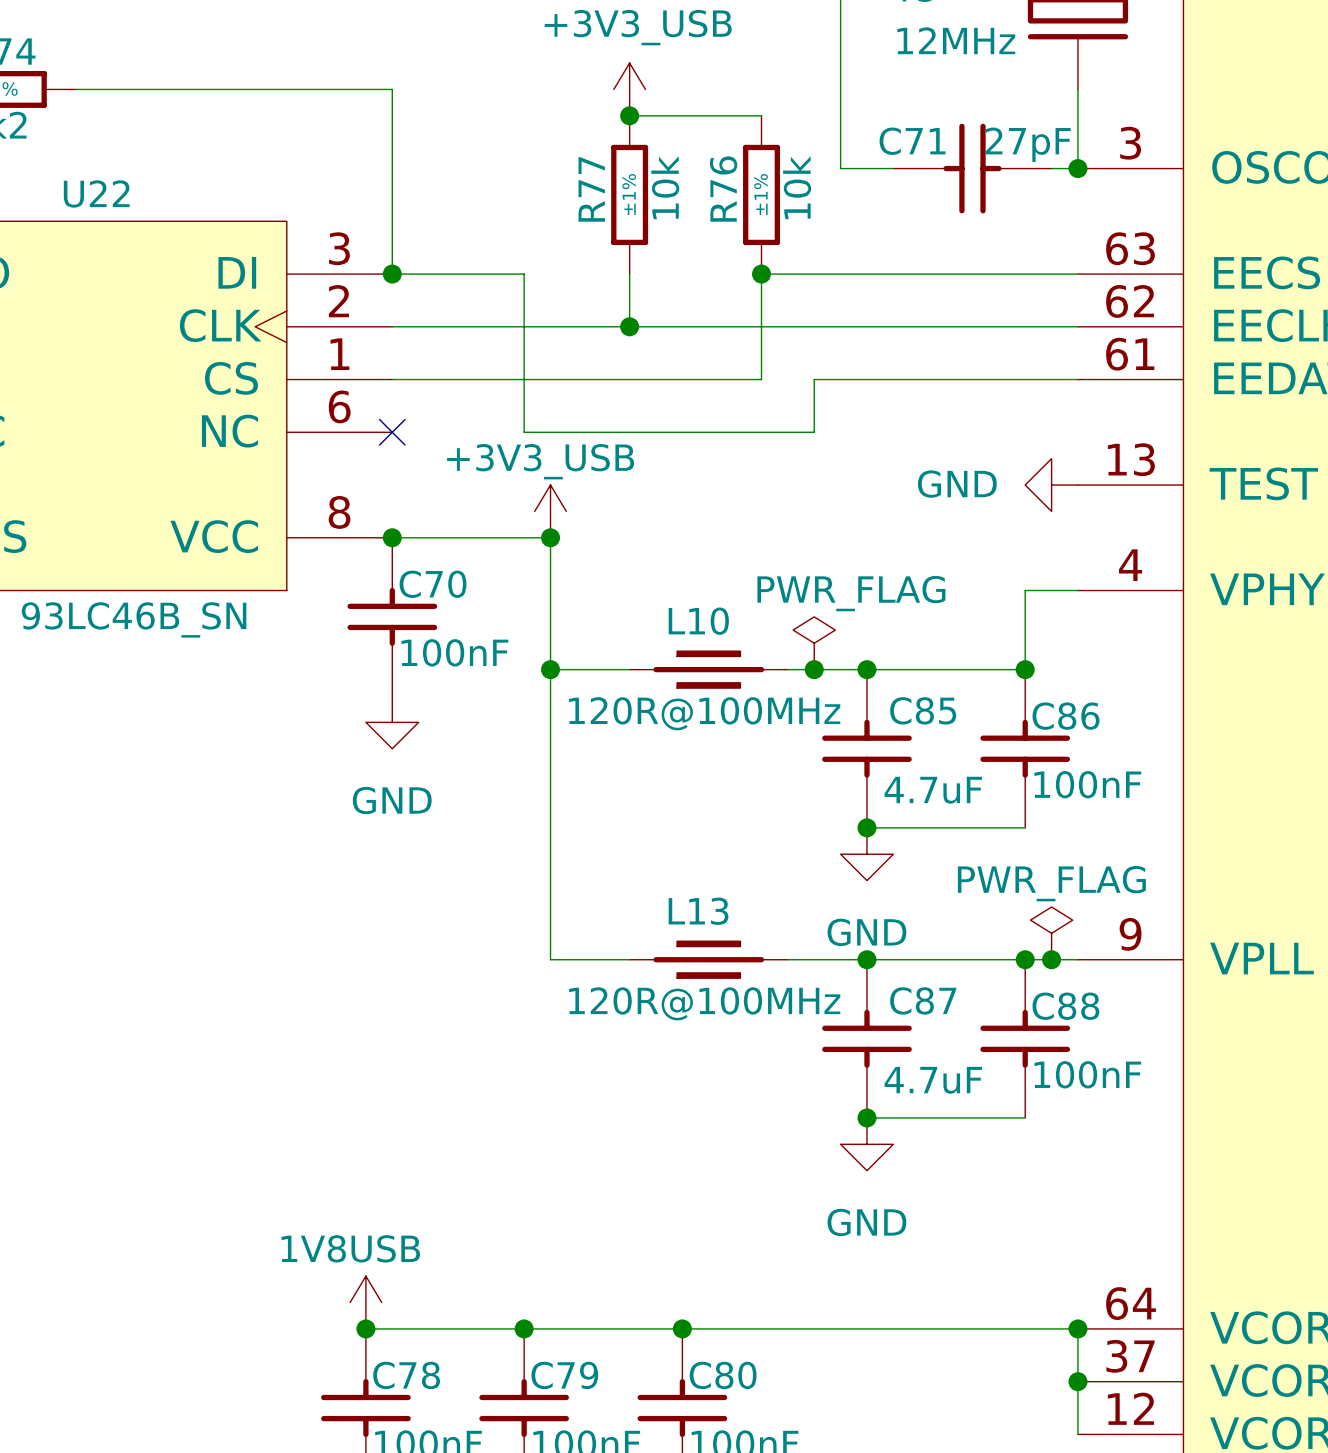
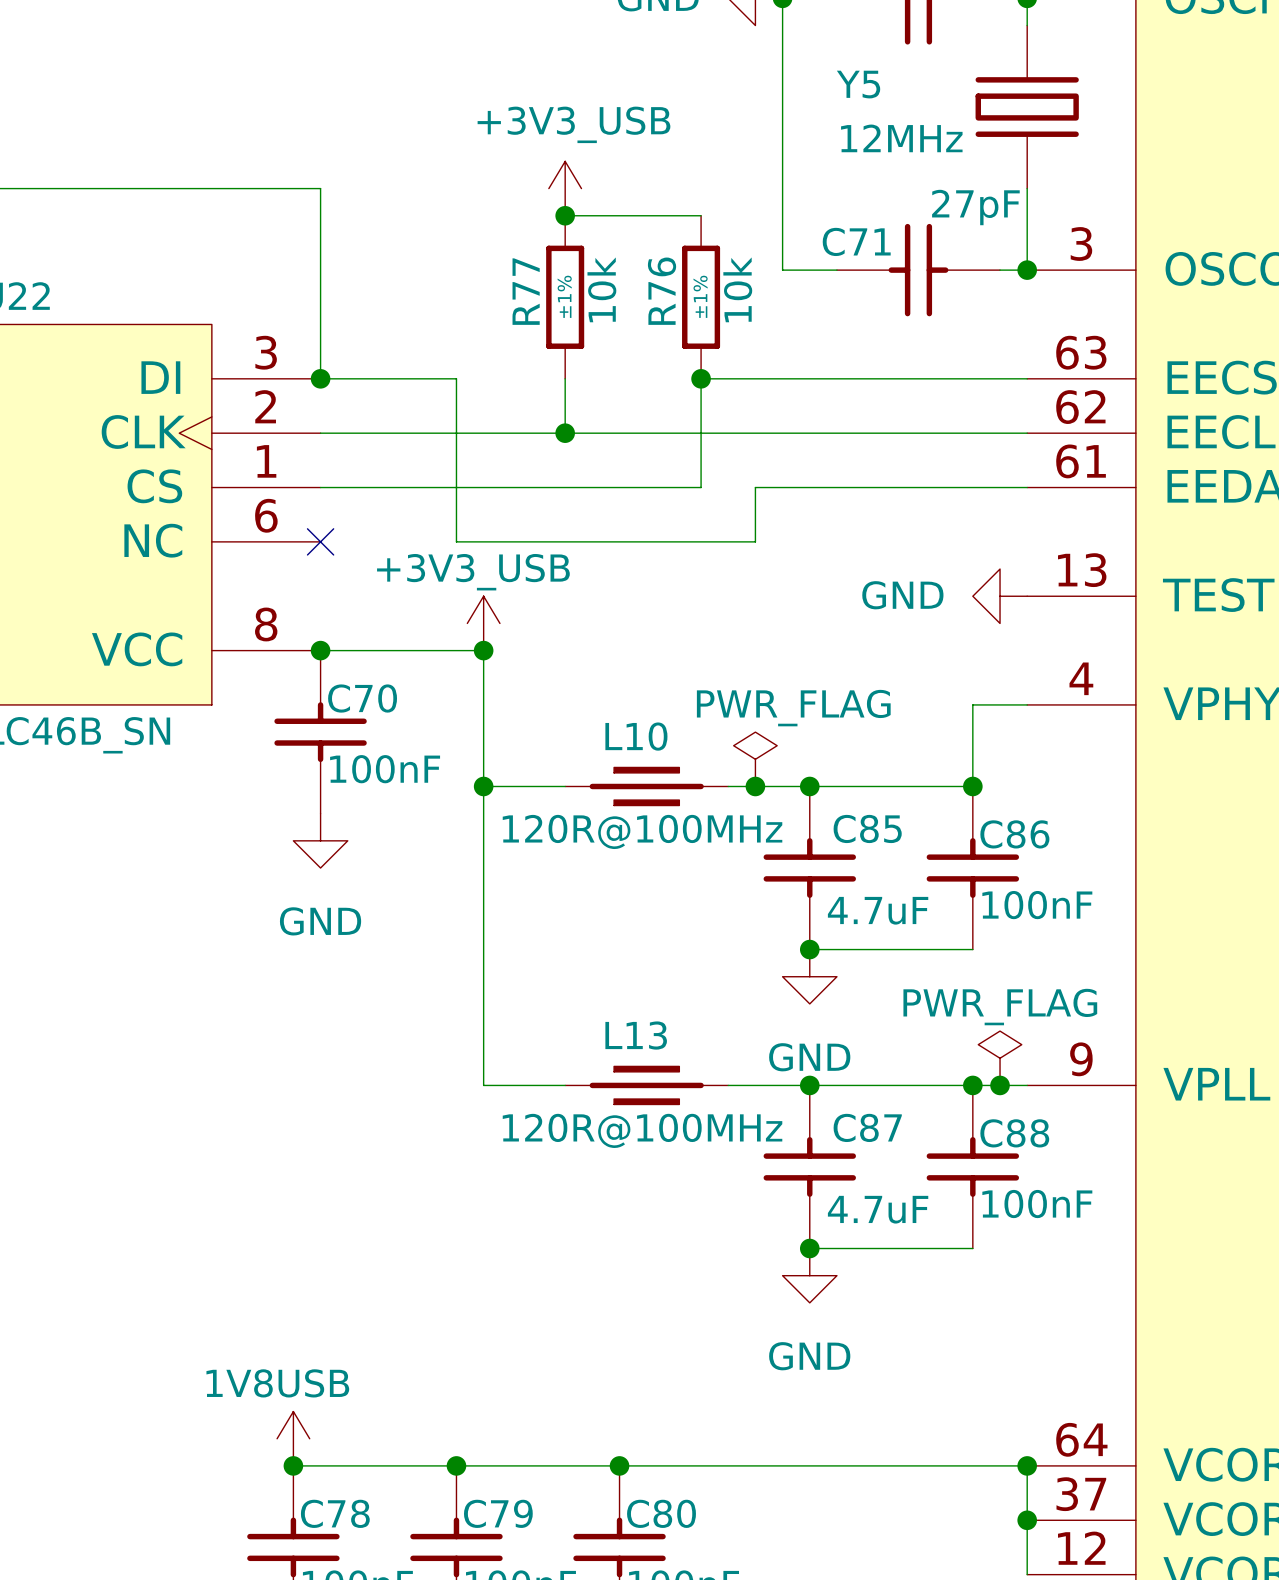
C71 text position: 27pF (1028, 144) -> 27pF (975, 207)

